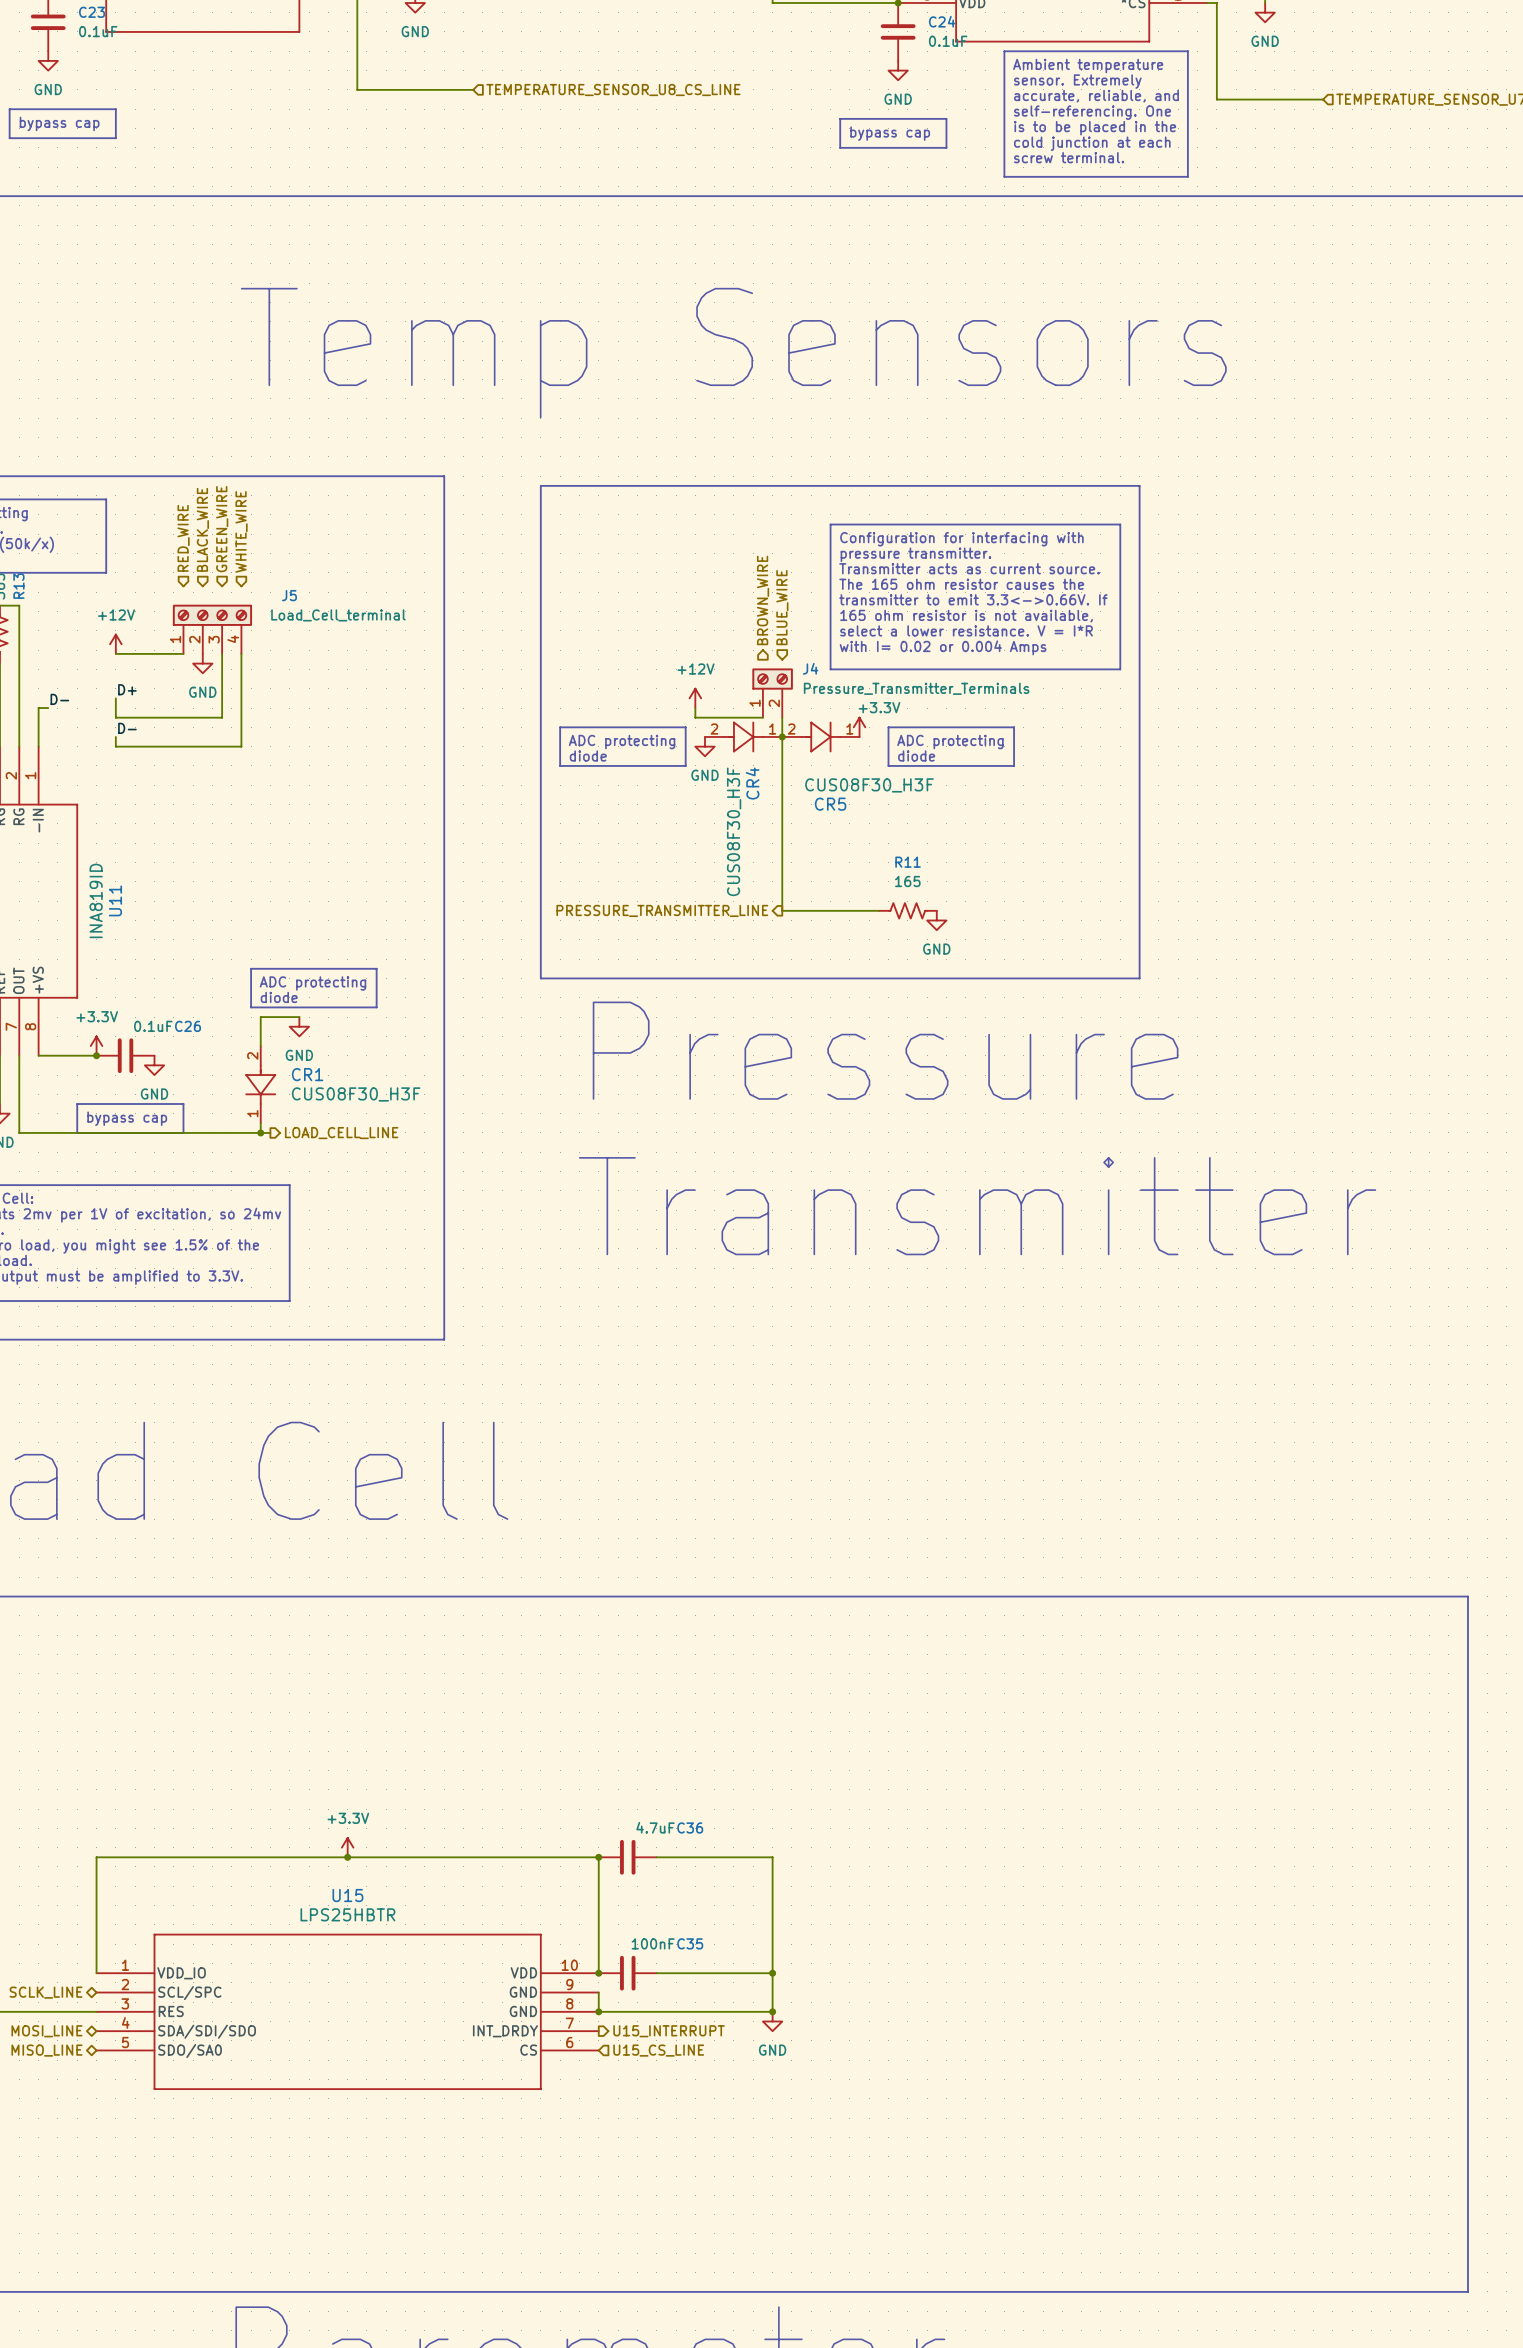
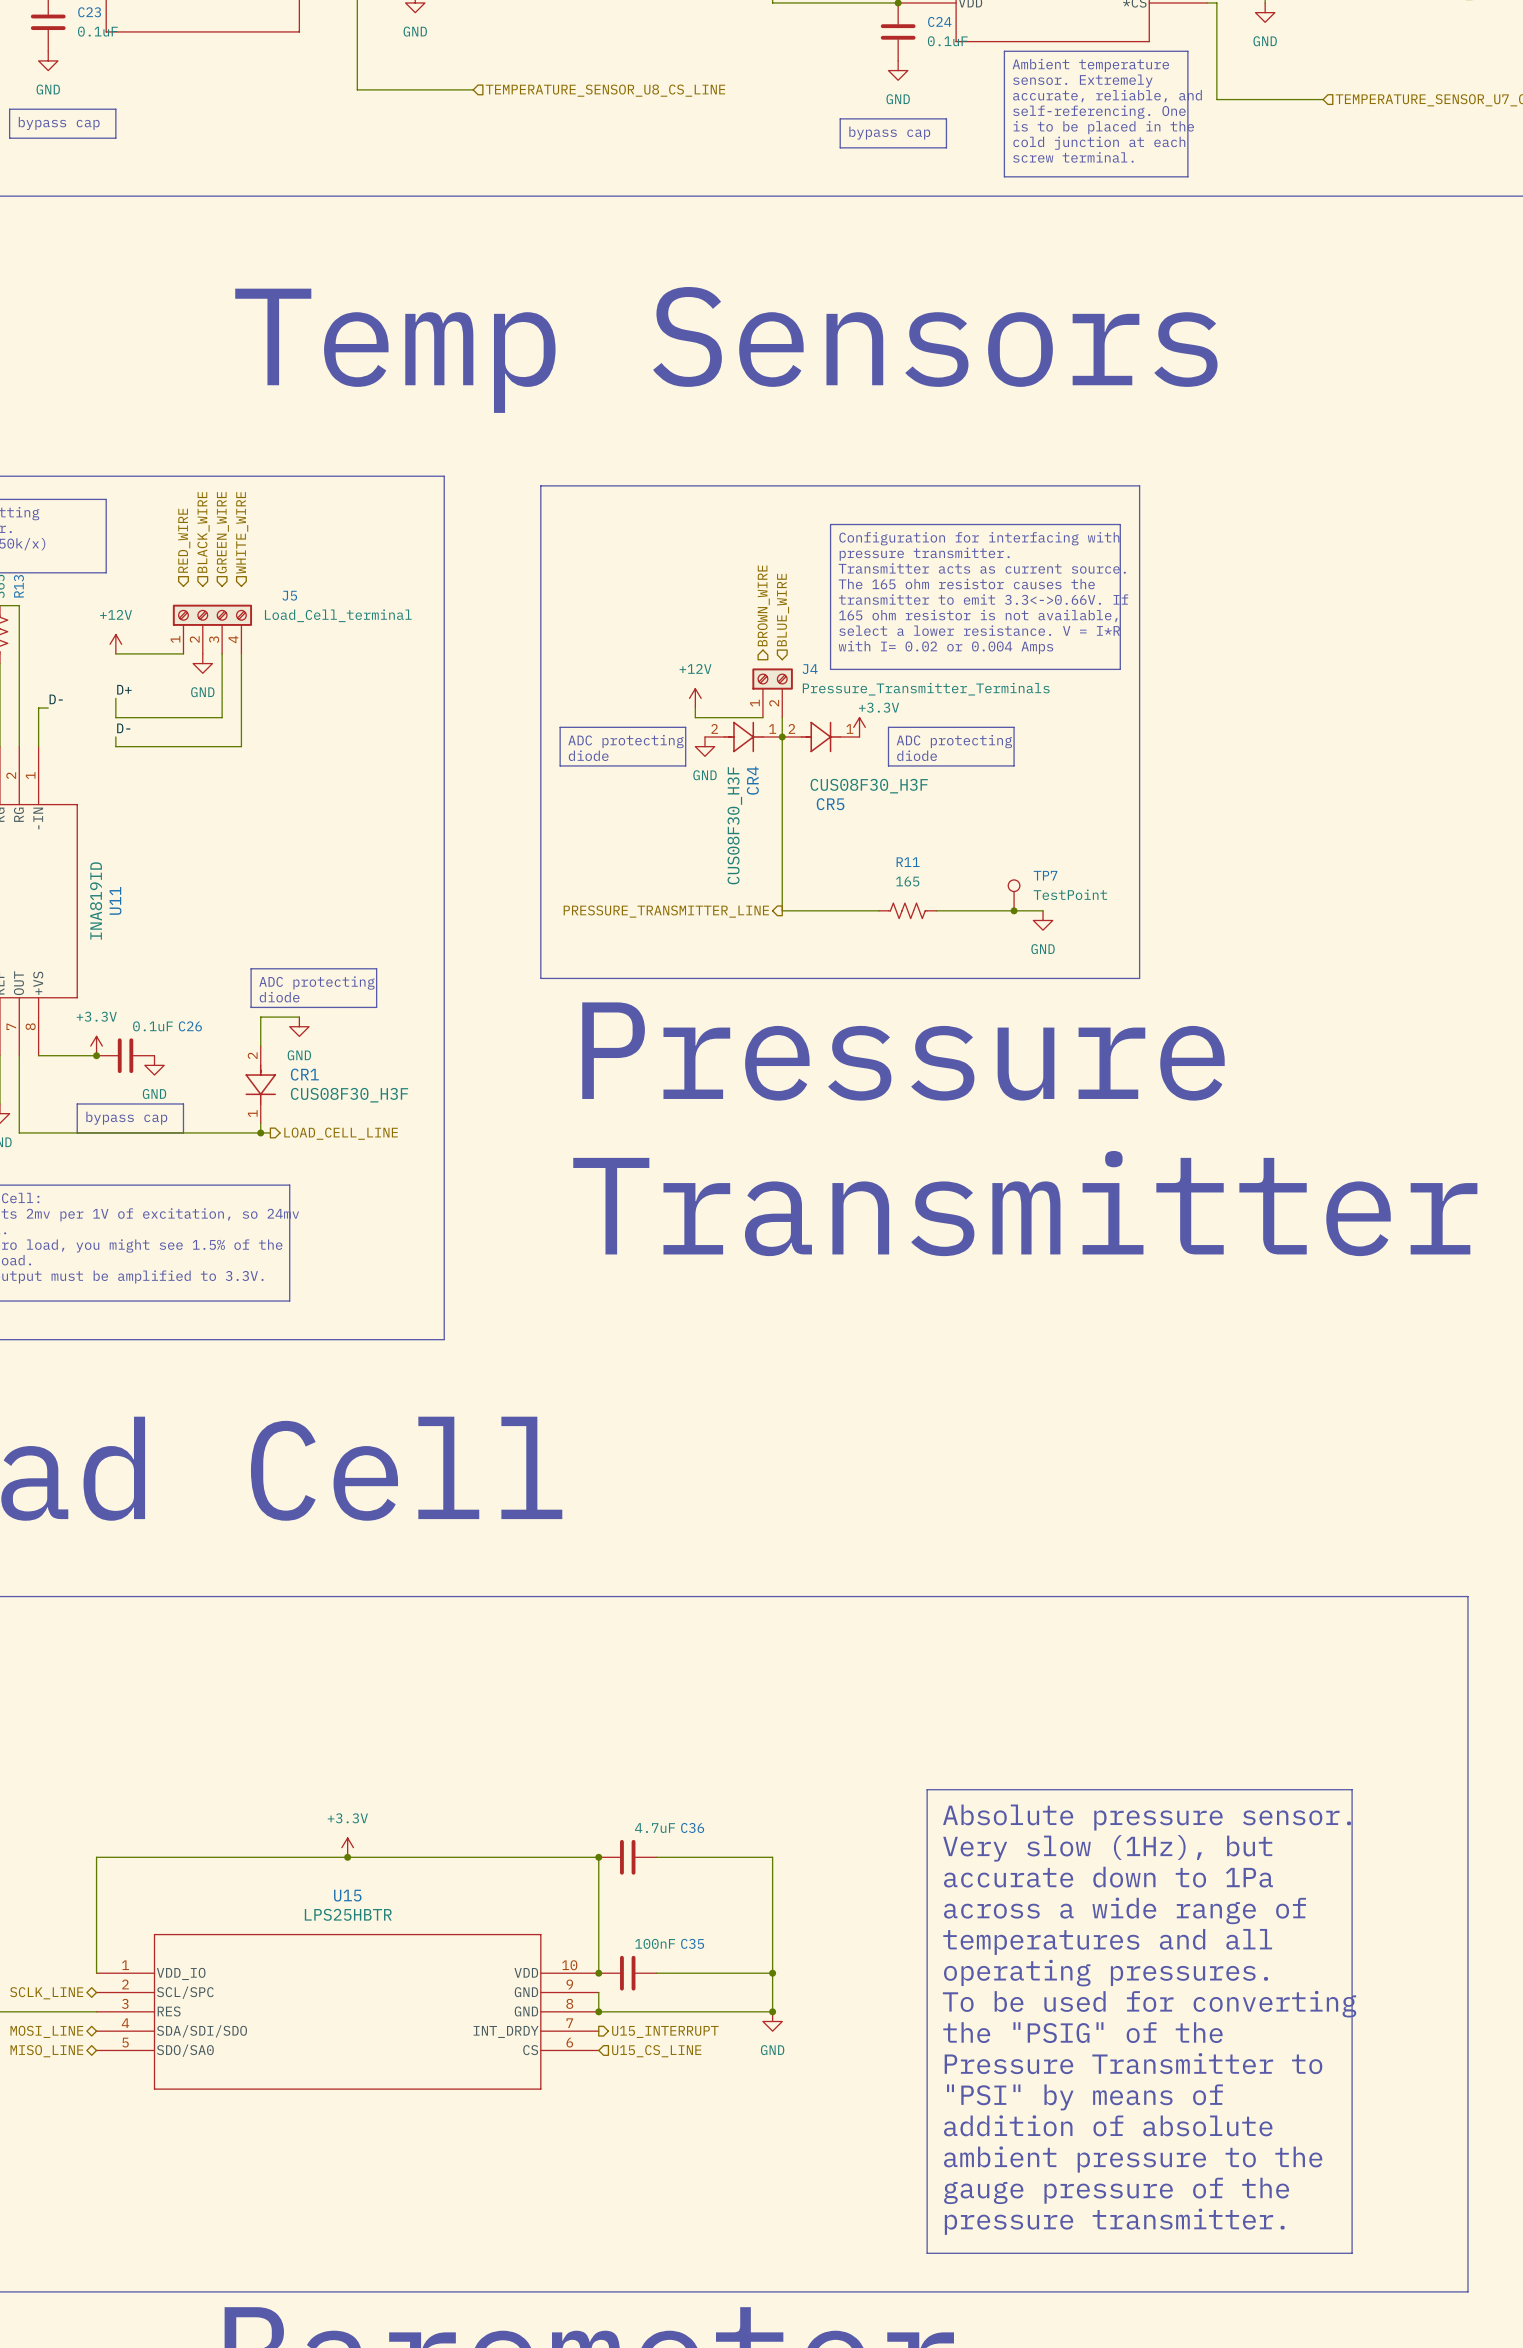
TP7: none -> TestPoint (1014, 895)
wire: none -> (936, 910) (1043, 910)
junction: none -> (1014, 910)
power symbol position: GND (936, 920) -> GND (1043, 920)
line: none -> (927, 1789) (1352, 1789) (1352, 2253) (927, 2253) (927, 1789)
text: none -> Absolute pressure sensor. (1147, 1817)
text: none -> Very slow (1Hz), but (1107, 1848)
text: none -> accurate down to 1Pa (1108, 1877)
text: none -> across a wide range of (1124, 1910)
text: none -> temperatures and all (1107, 1941)
text: none -> operating pressures. (1106, 1973)
text: none -> To be used for converting (1149, 2004)
text: none -> the "PSIG" of the (1082, 2032)
text: none -> Pressure Transmitter to (1133, 2063)
text: none -> "PSI" by means of (1084, 2097)
text: none -> addition of absolute (1108, 2125)
text: none -> ambient pressure to the (1133, 2159)
text: none -> gauge pressure of the (1116, 2190)
text: none -> pressure transmitter. (1114, 2221)

